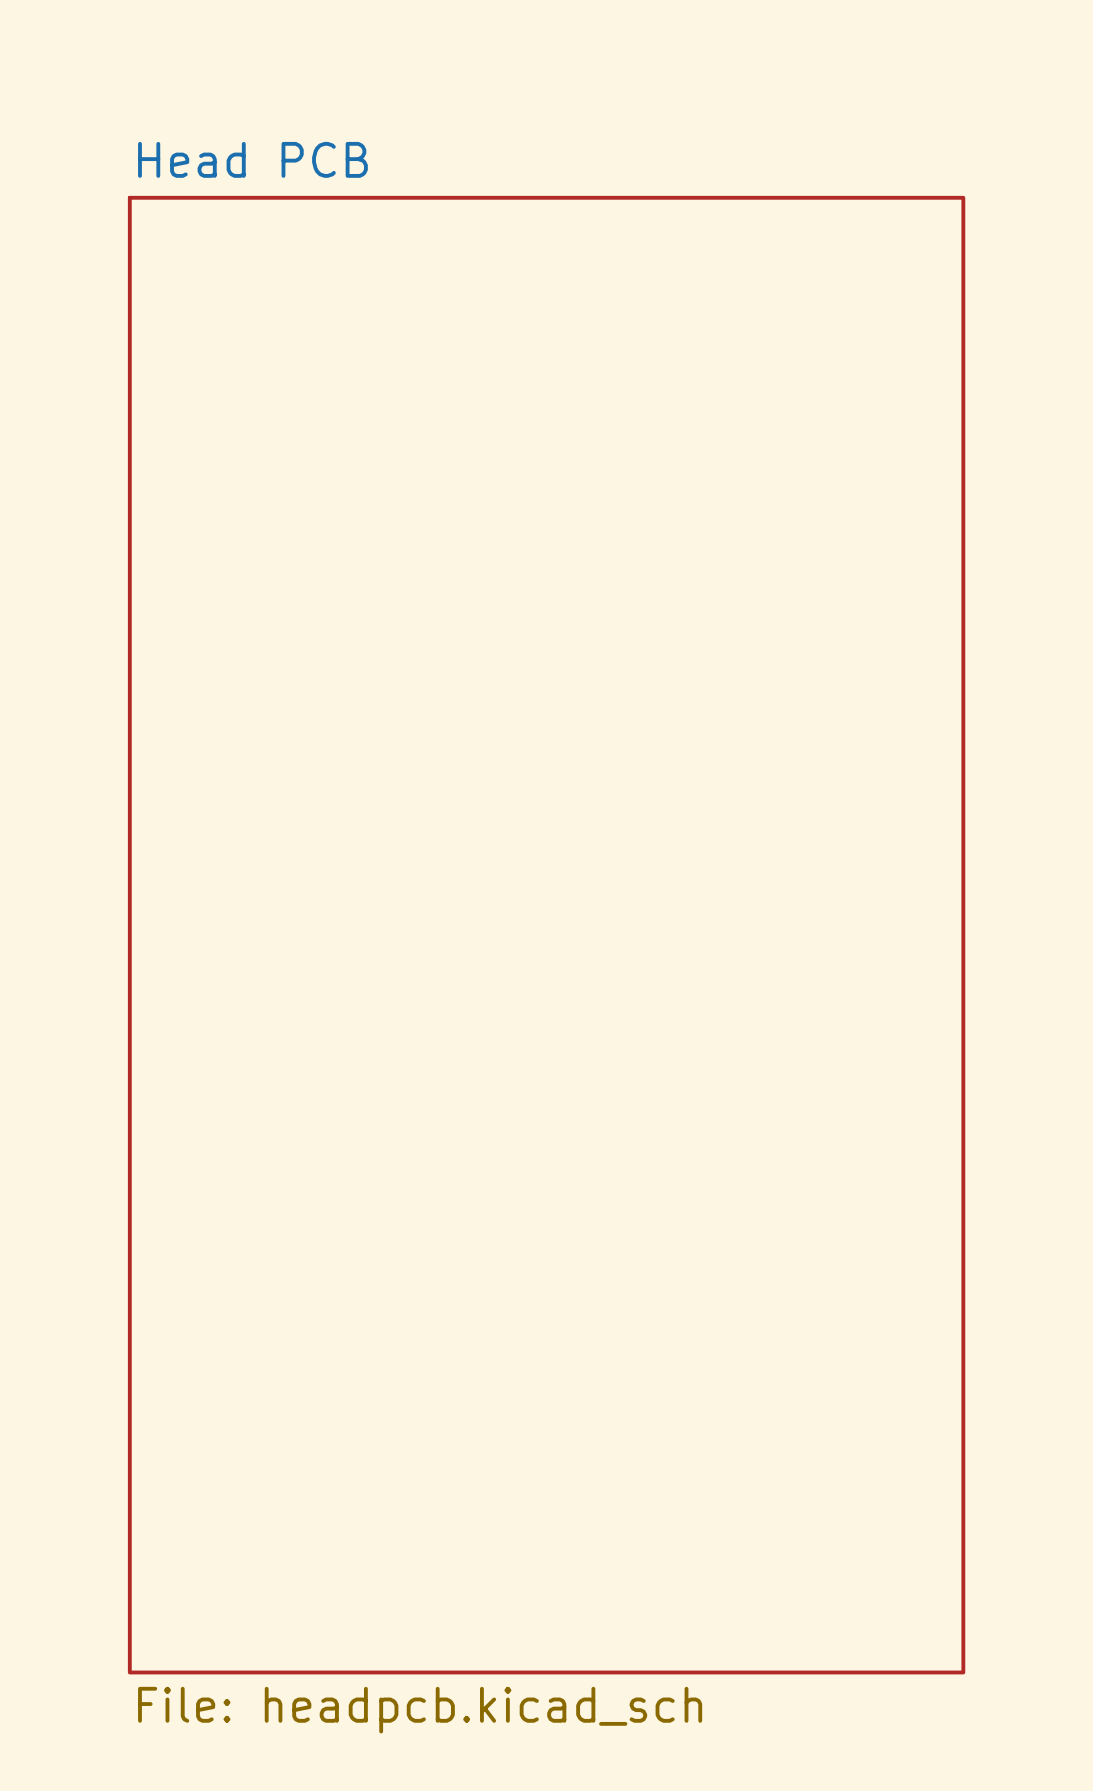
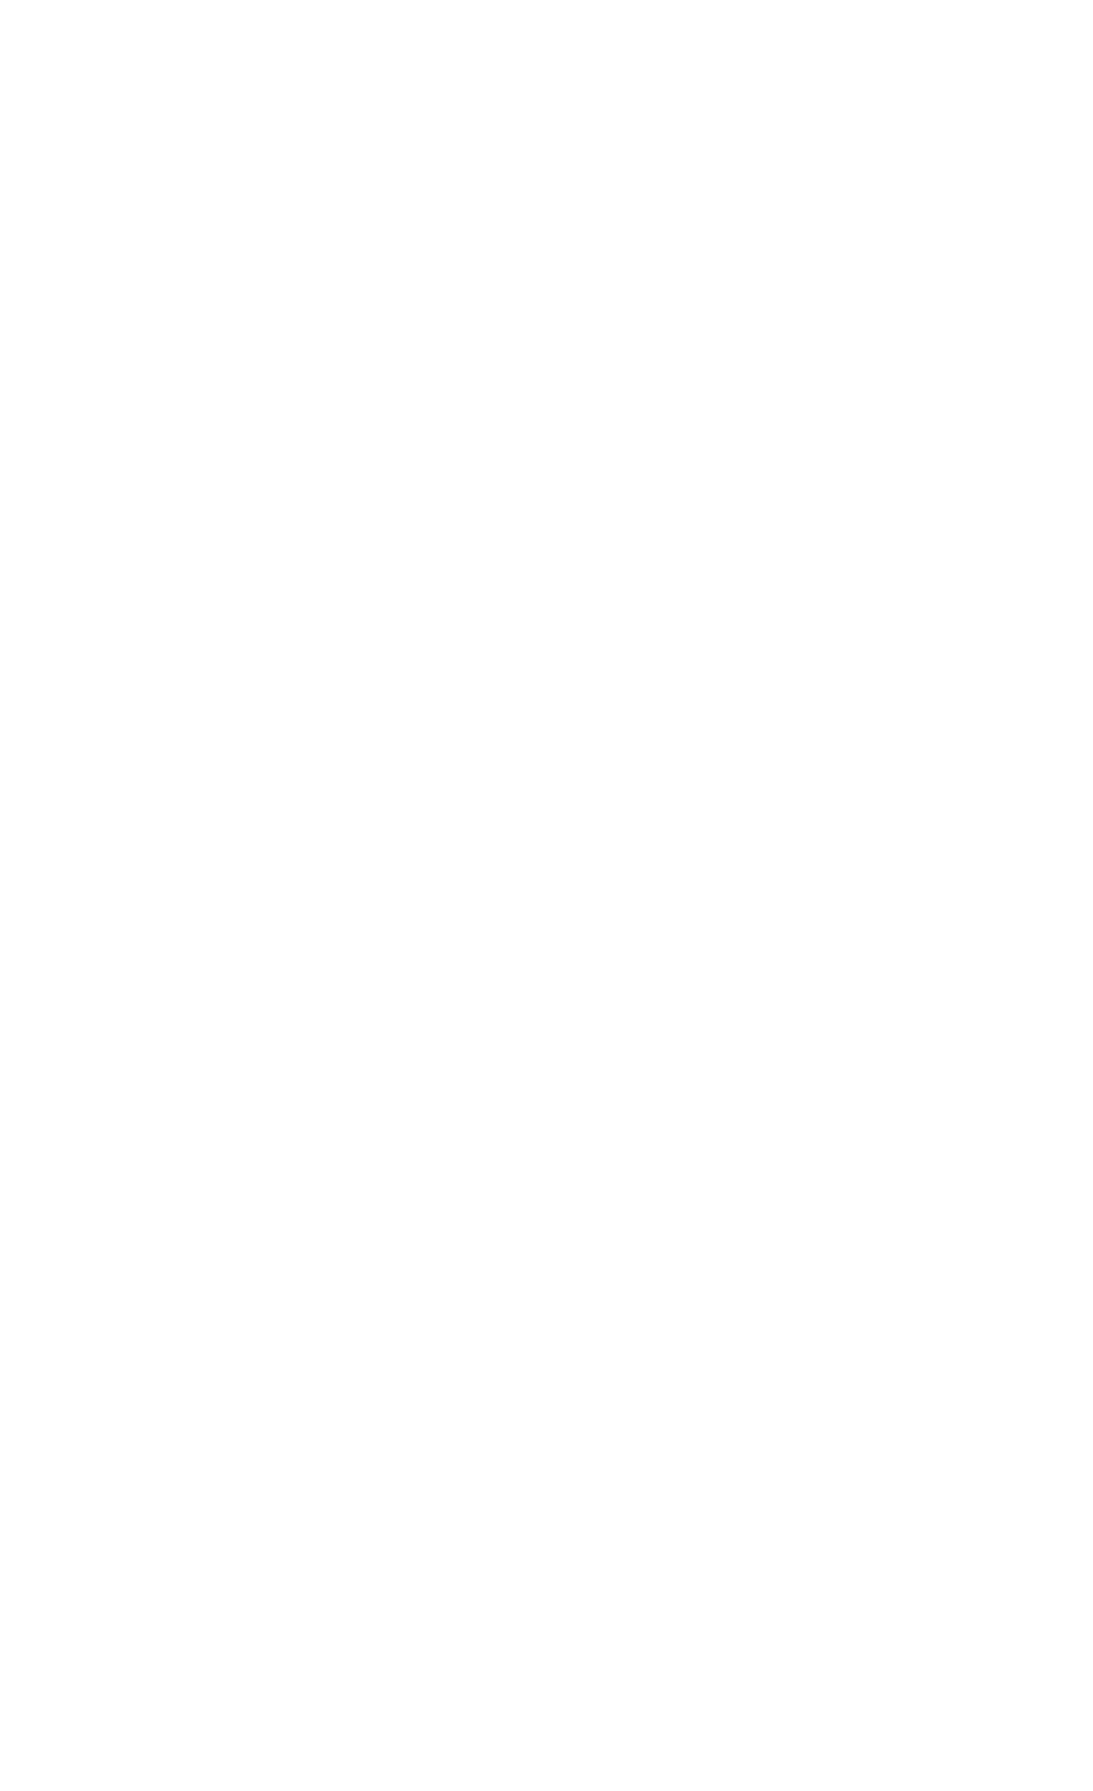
sheet Head PCB: File: headpcb.kicad_sch (546, 935) -> none

